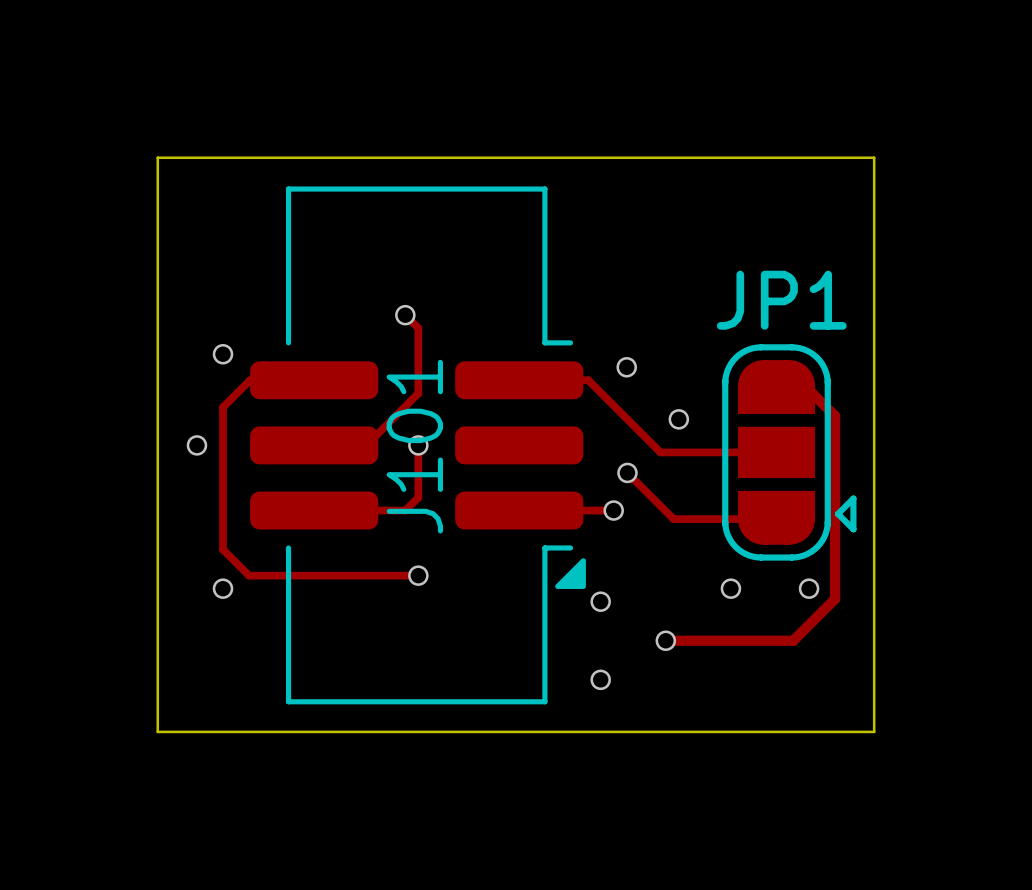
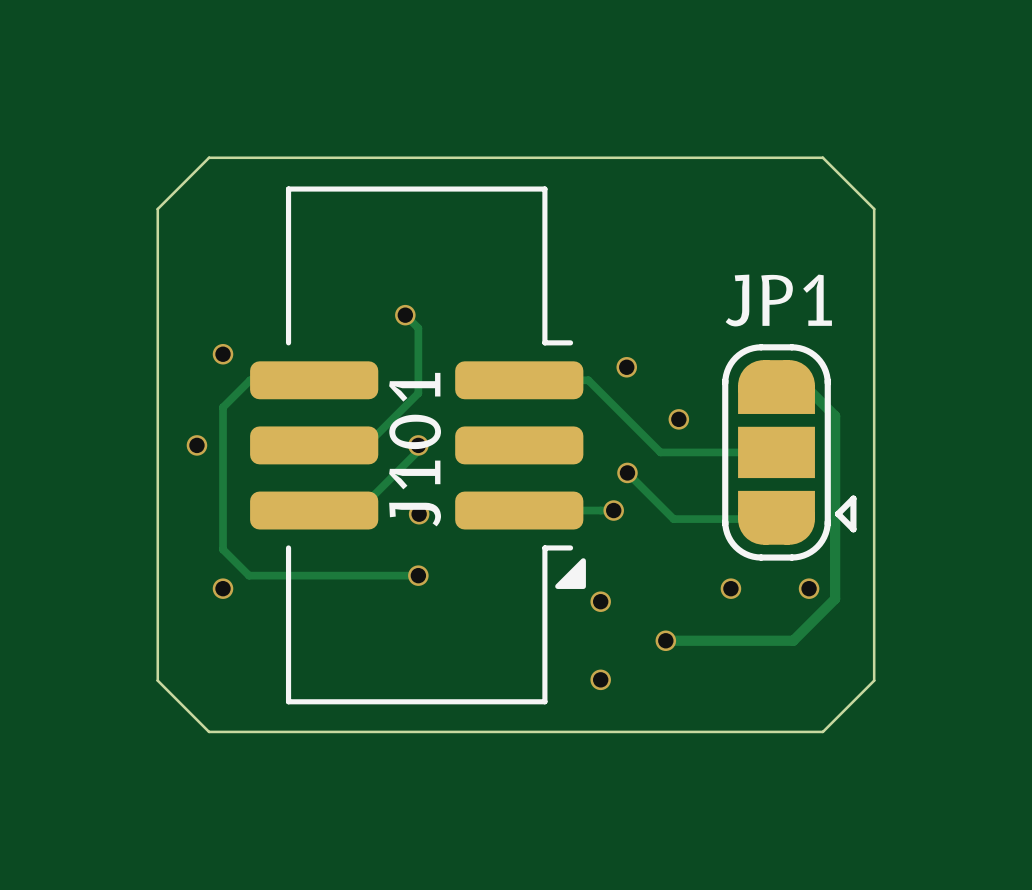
board edge: (209, 157) (157, 157) (157, 209) -> (209, 157) (157, 209)
board edge: (822, 157) (874, 157) (874, 209) -> (822, 157) (874, 209)
track: (418, 450) (418, 497) (405, 510) (358, 510) -> (418, 450) (358, 510)
via: none -> (419, 514)
board edge: (157, 680) (157, 731) (209, 731) -> (157, 680) (209, 731)
board edge: (874, 680) (874, 731) (822, 731) -> (874, 680) (822, 731)

